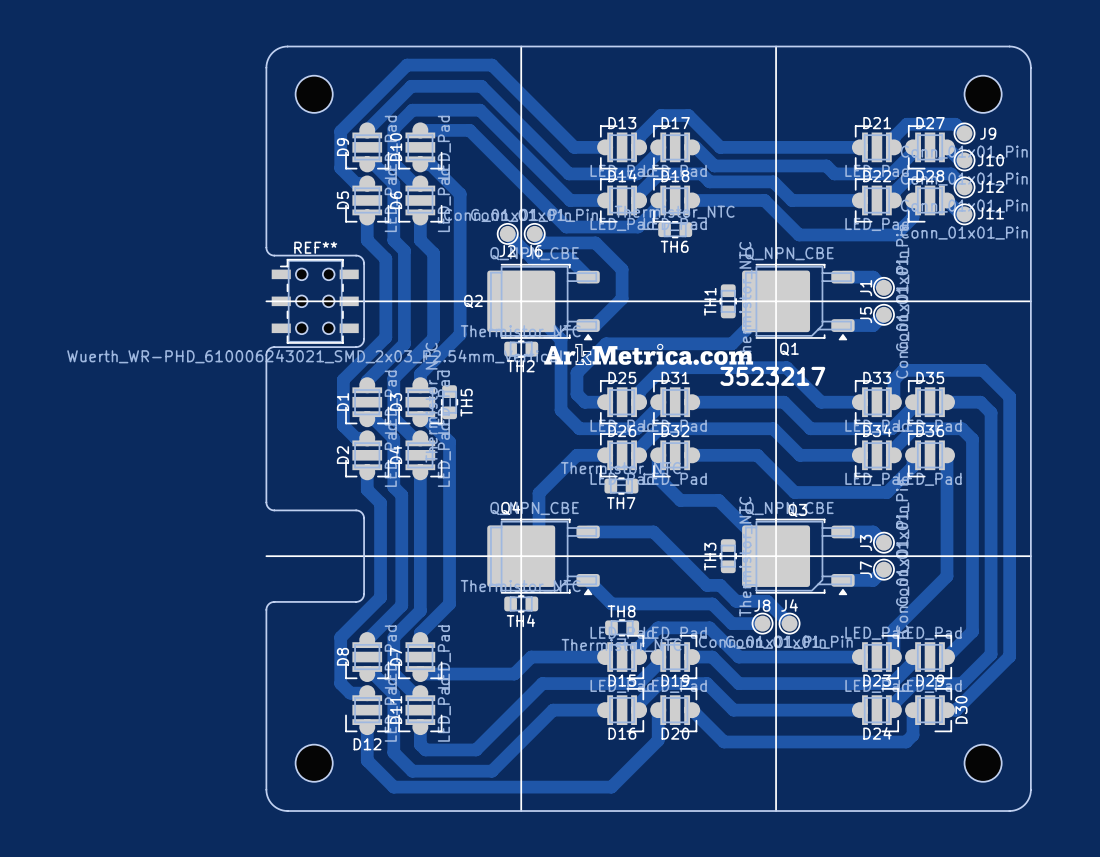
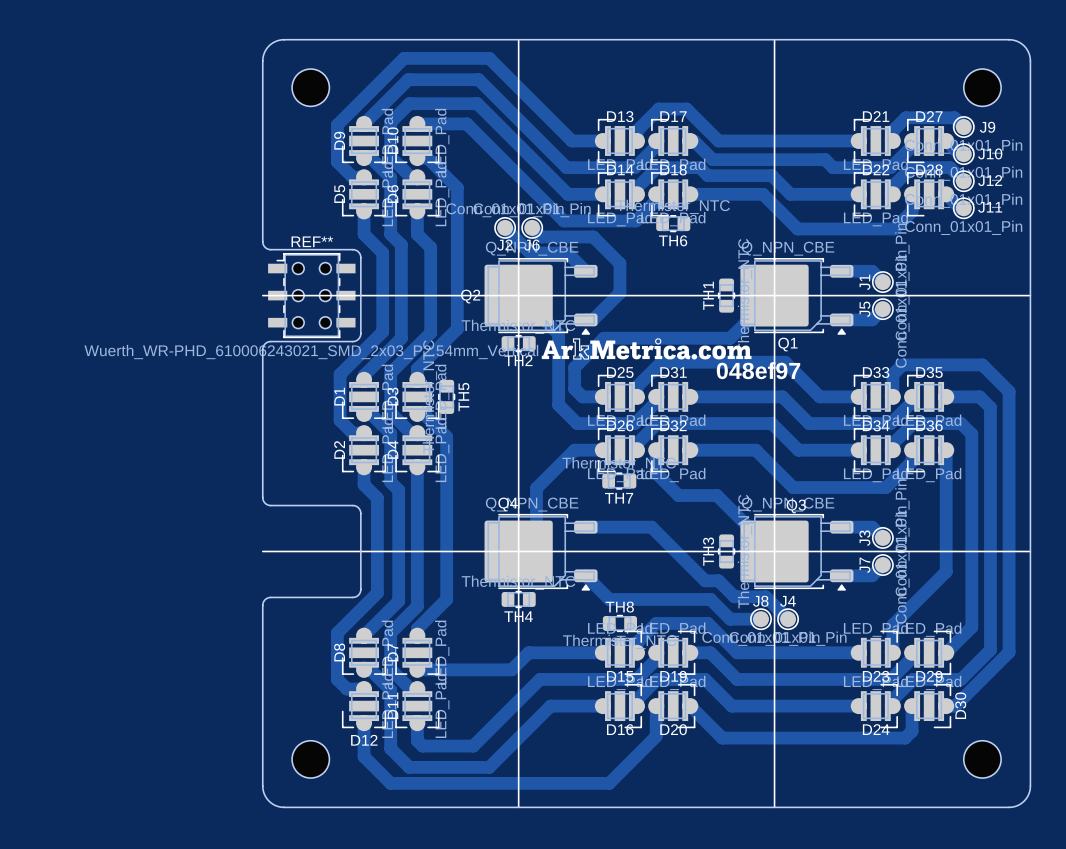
text: 3523217 (772, 376) -> 048ef97 (758, 370)

